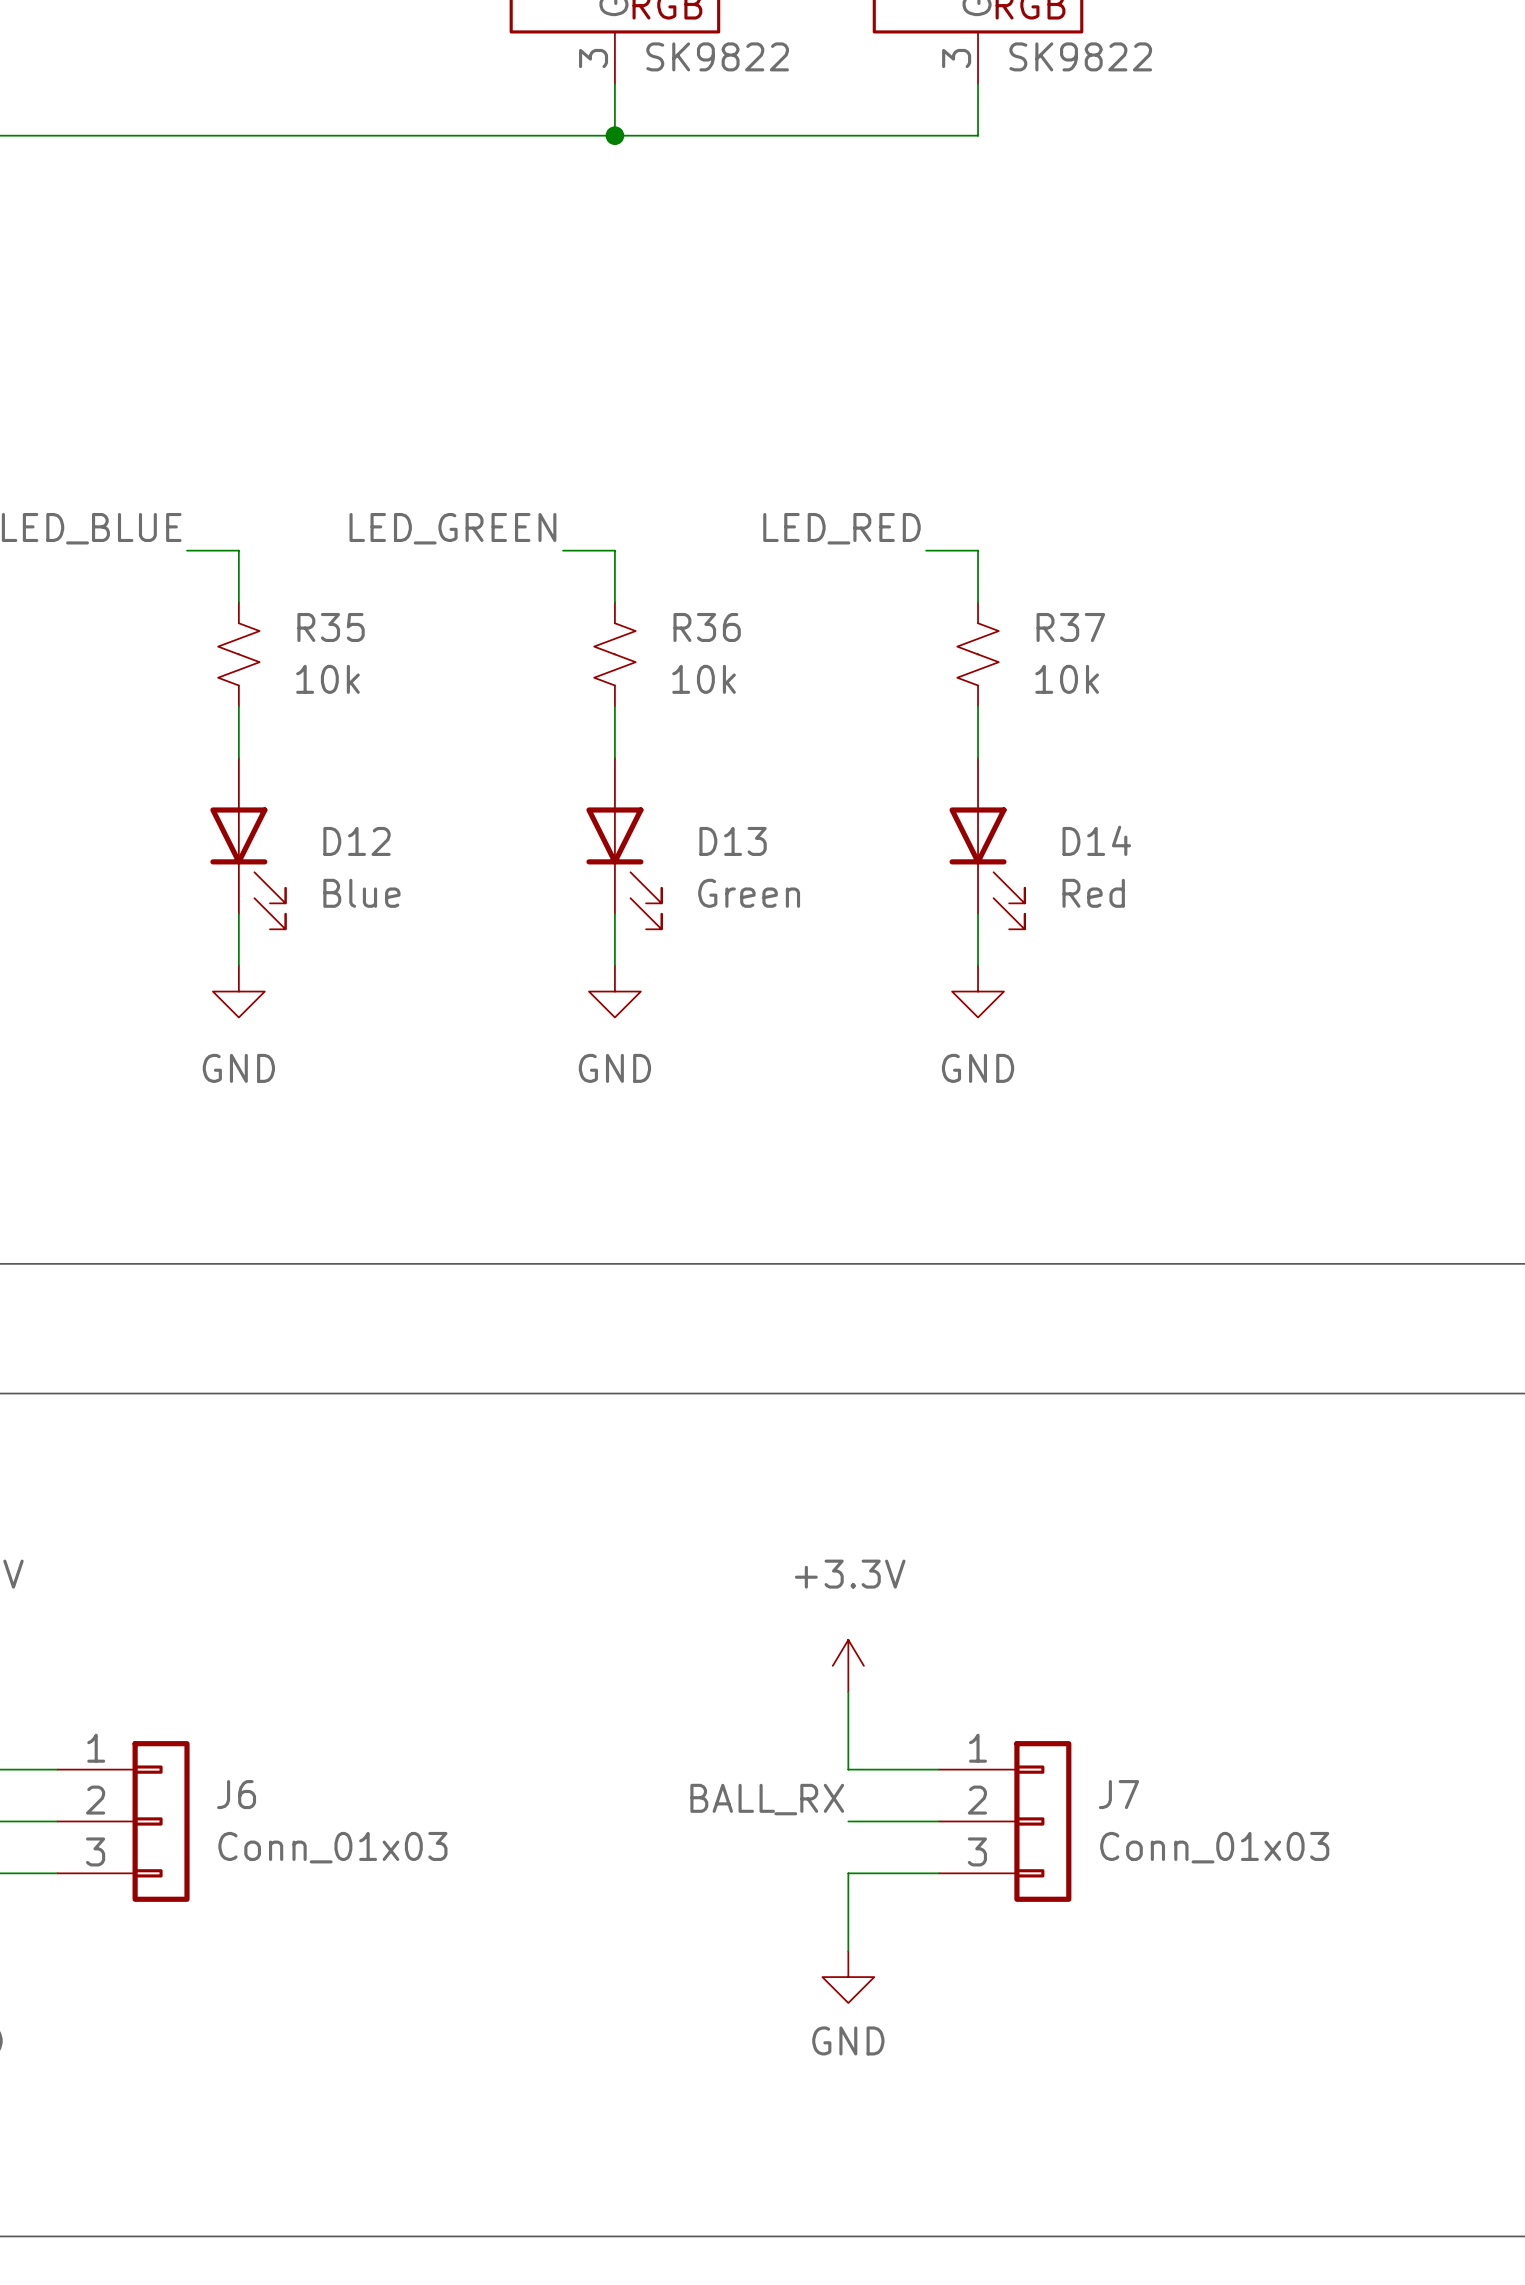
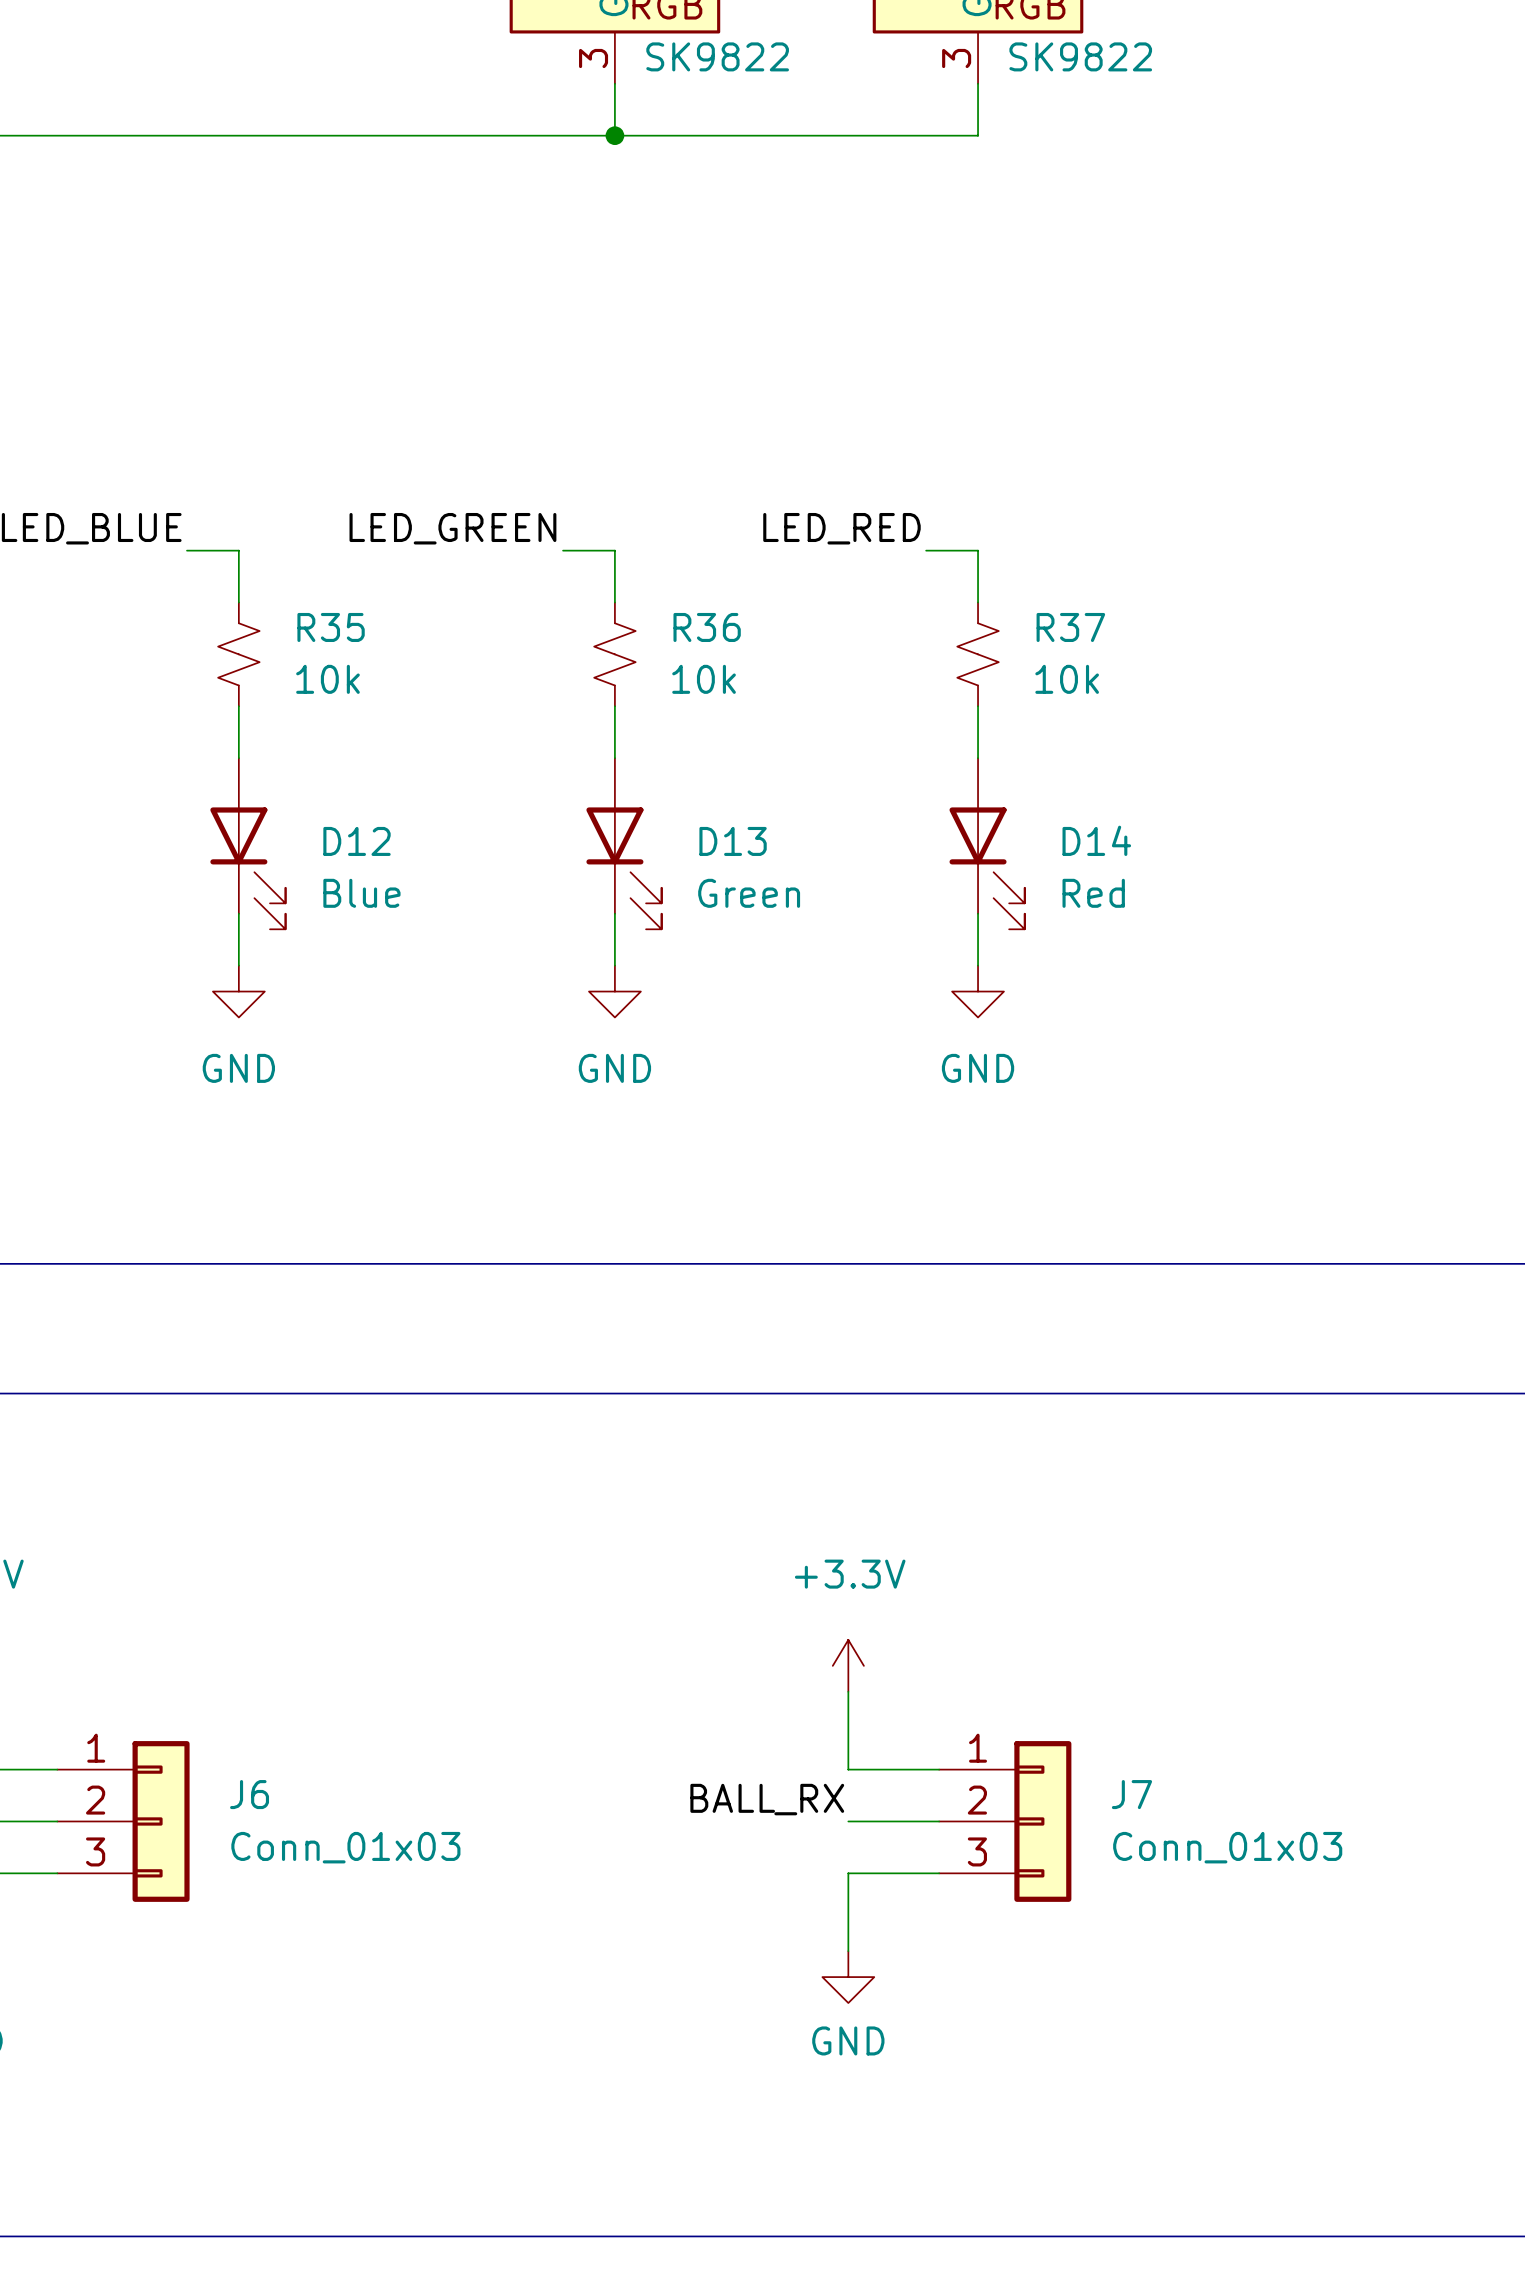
J6 name position: J6 (236, 1794) -> J6 (249, 1794)
J7 name position: J7 (1119, 1794) -> J7 (1131, 1794)
J6 value position: Conn_01x03 (332, 1847) -> Conn_01x03 (345, 1847)
J7 value position: Conn_01x03 (1214, 1847) -> Conn_01x03 (1227, 1847)

